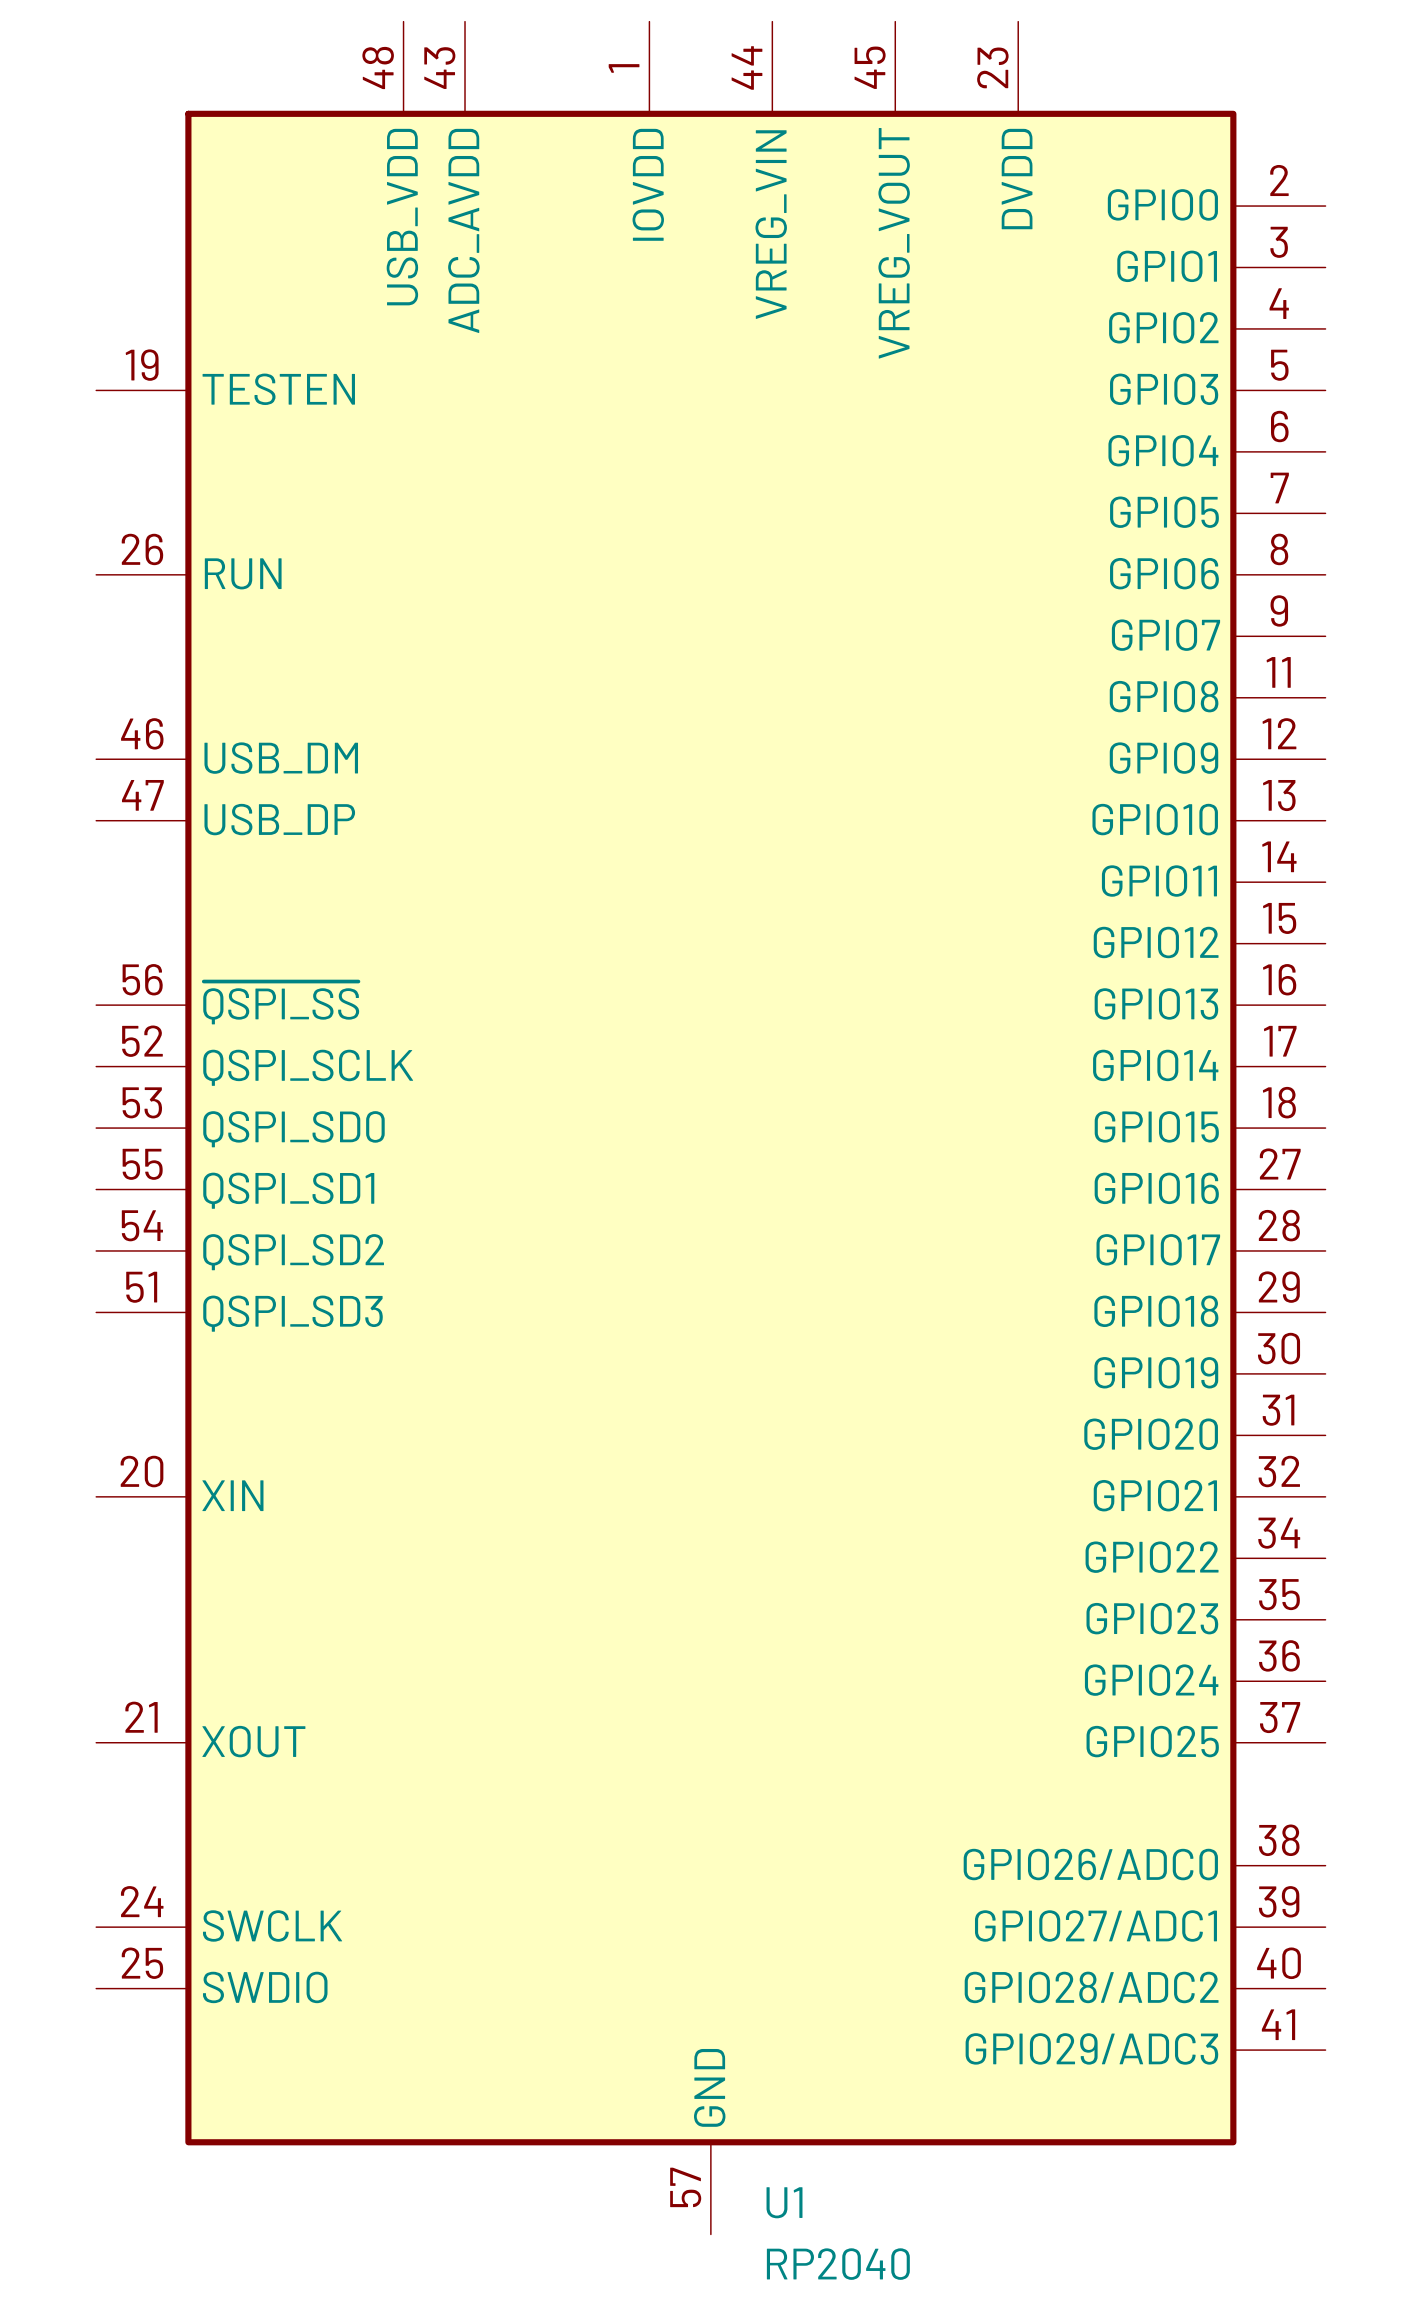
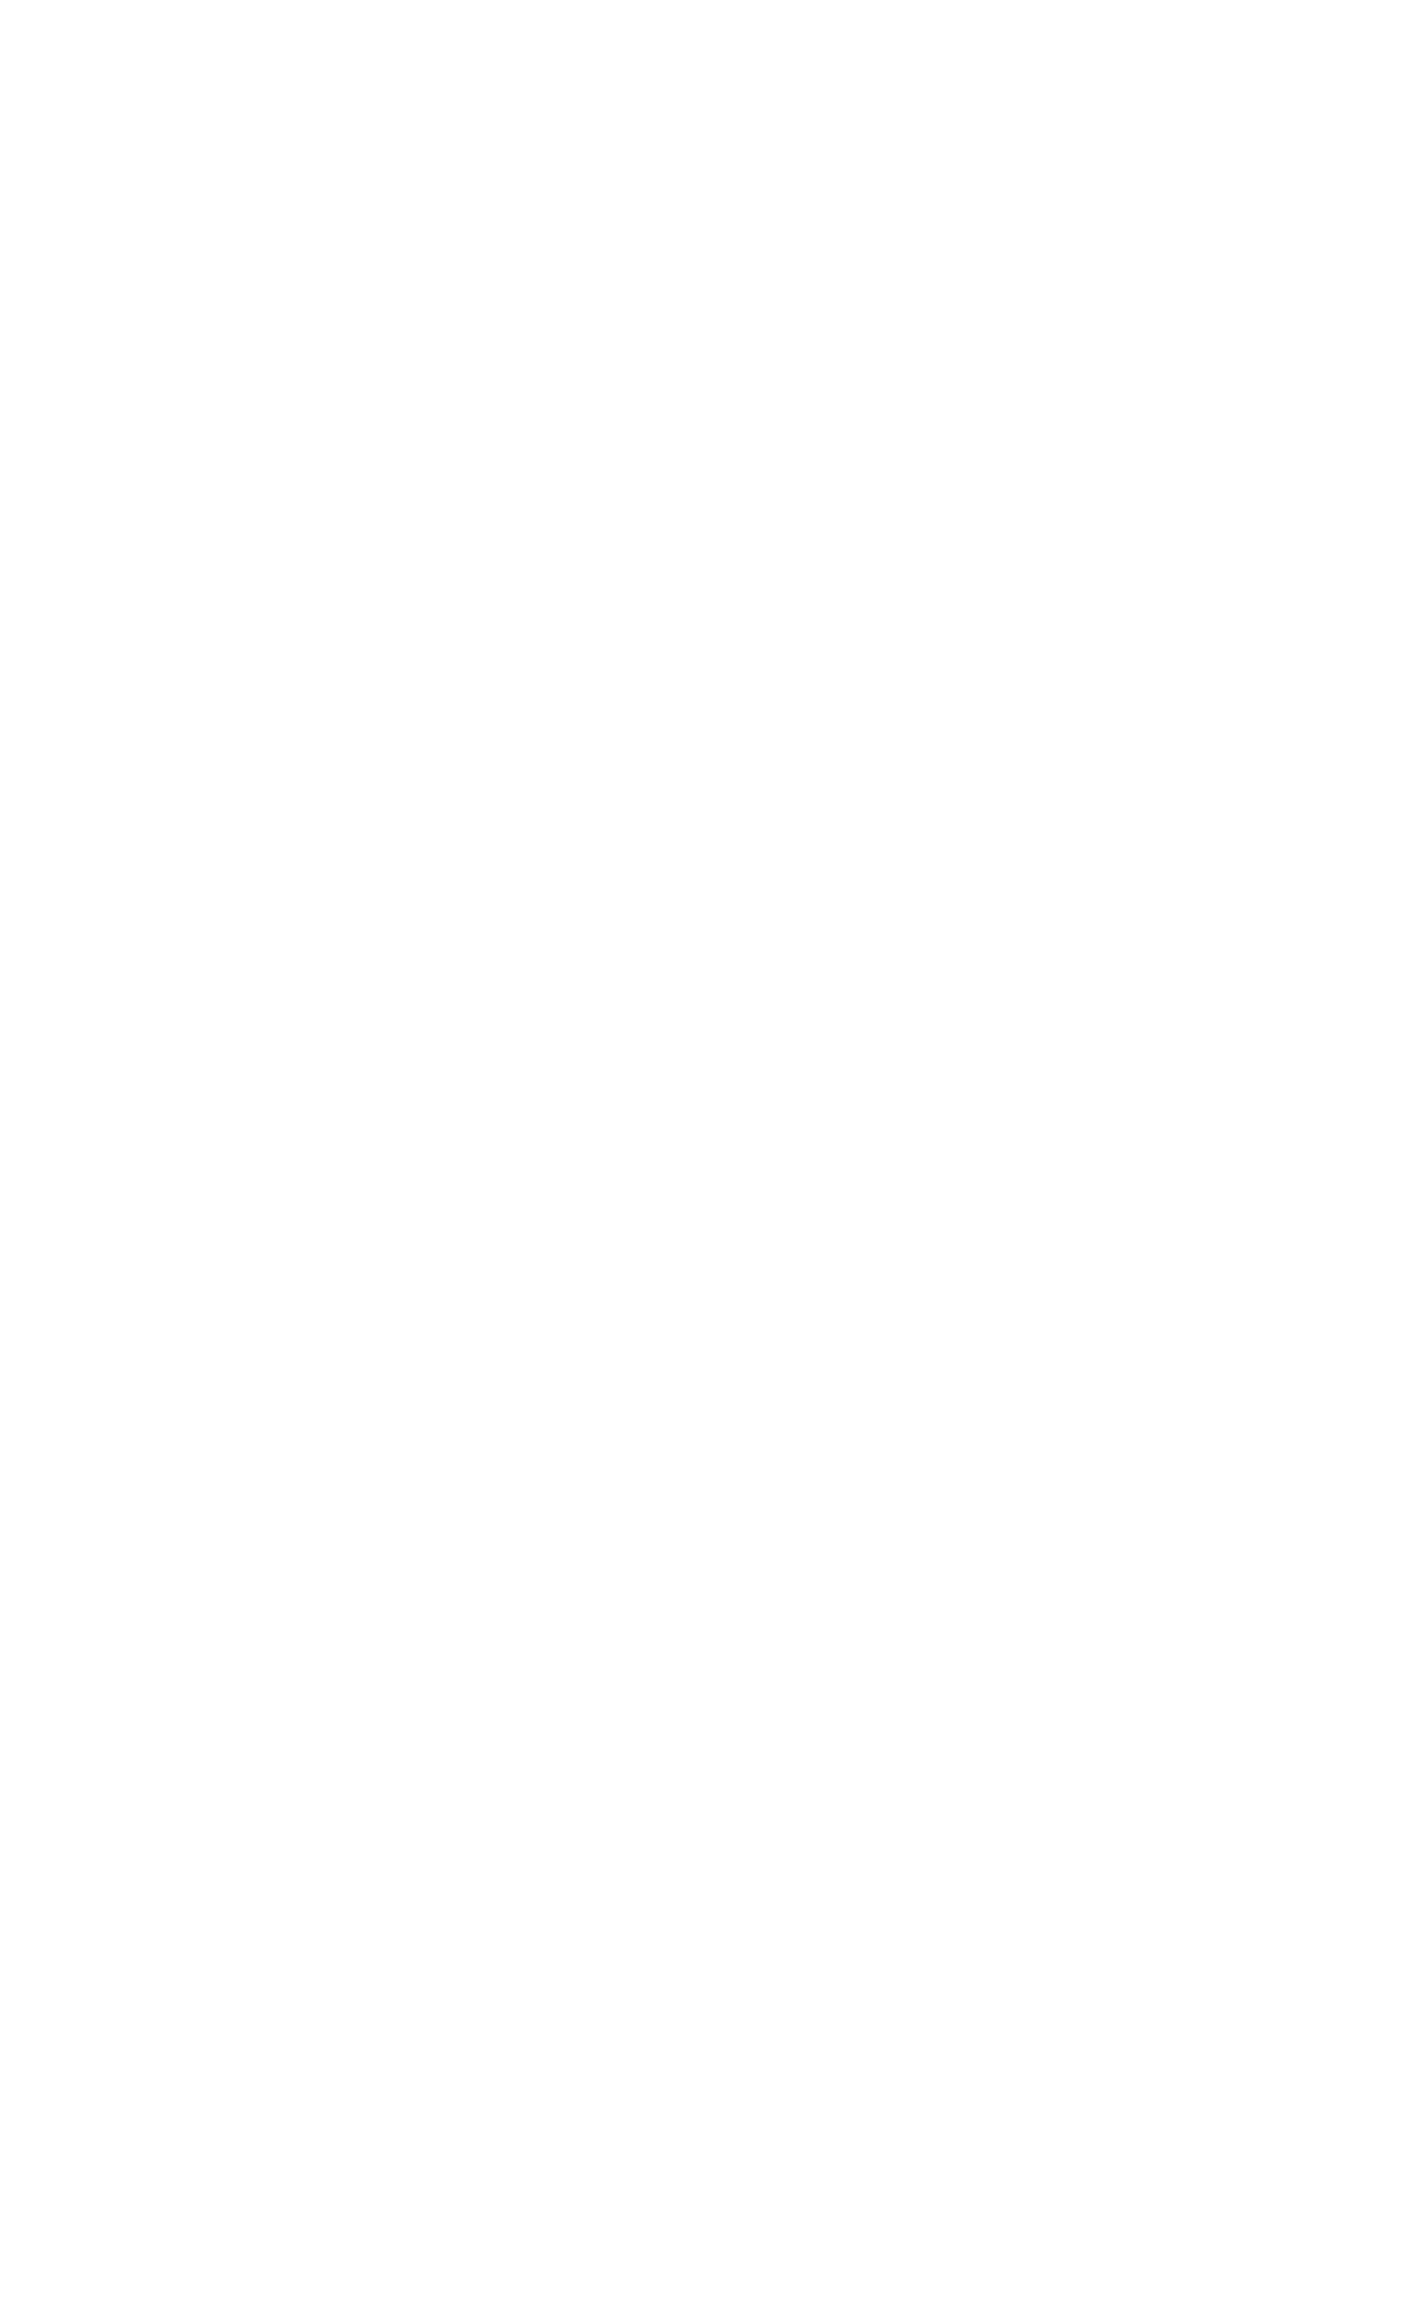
U1: RP2040 (710, 1128) -> none

